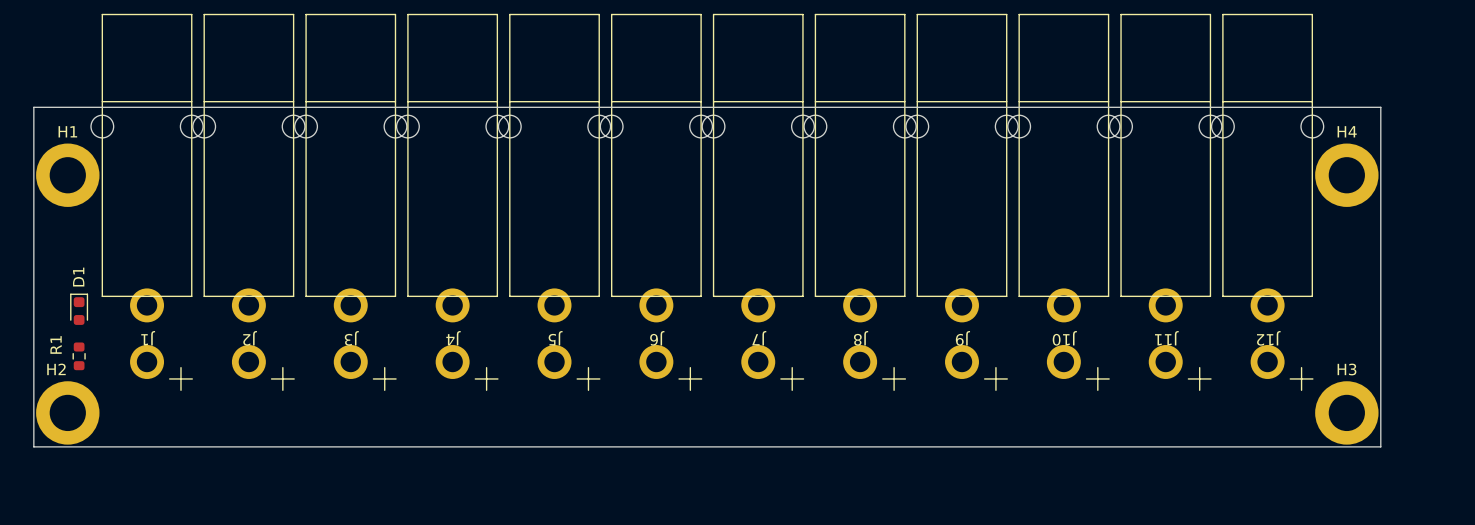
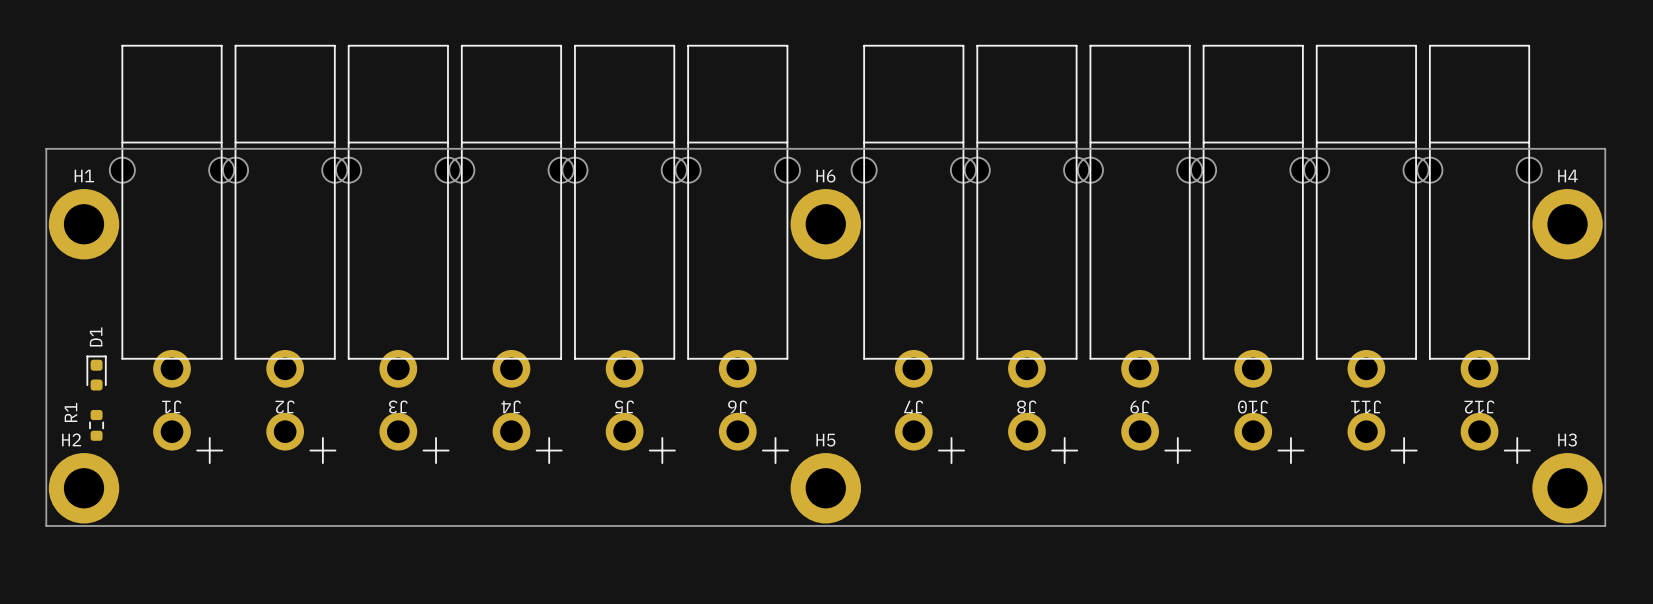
board edge: (1380, 107) (1380, 446) -> (1542, 148) (1605, 148) (1605, 525) (1542, 525)
H6: none -> (825, 224)
H4 position: (1346, 175) -> (1567, 224)
J7 position: (758, 202) -> (913, 254)
J8 position: (860, 202) -> (1026, 254)
J9 position: (962, 202) -> (1140, 254)
J10 position: (1063, 202) -> (1253, 254)
J11 position: (1165, 202) -> (1366, 254)
J12 position: (1267, 202) -> (1479, 254)
H5: none -> (825, 488)
H3 position: (1346, 412) -> (1567, 488)

